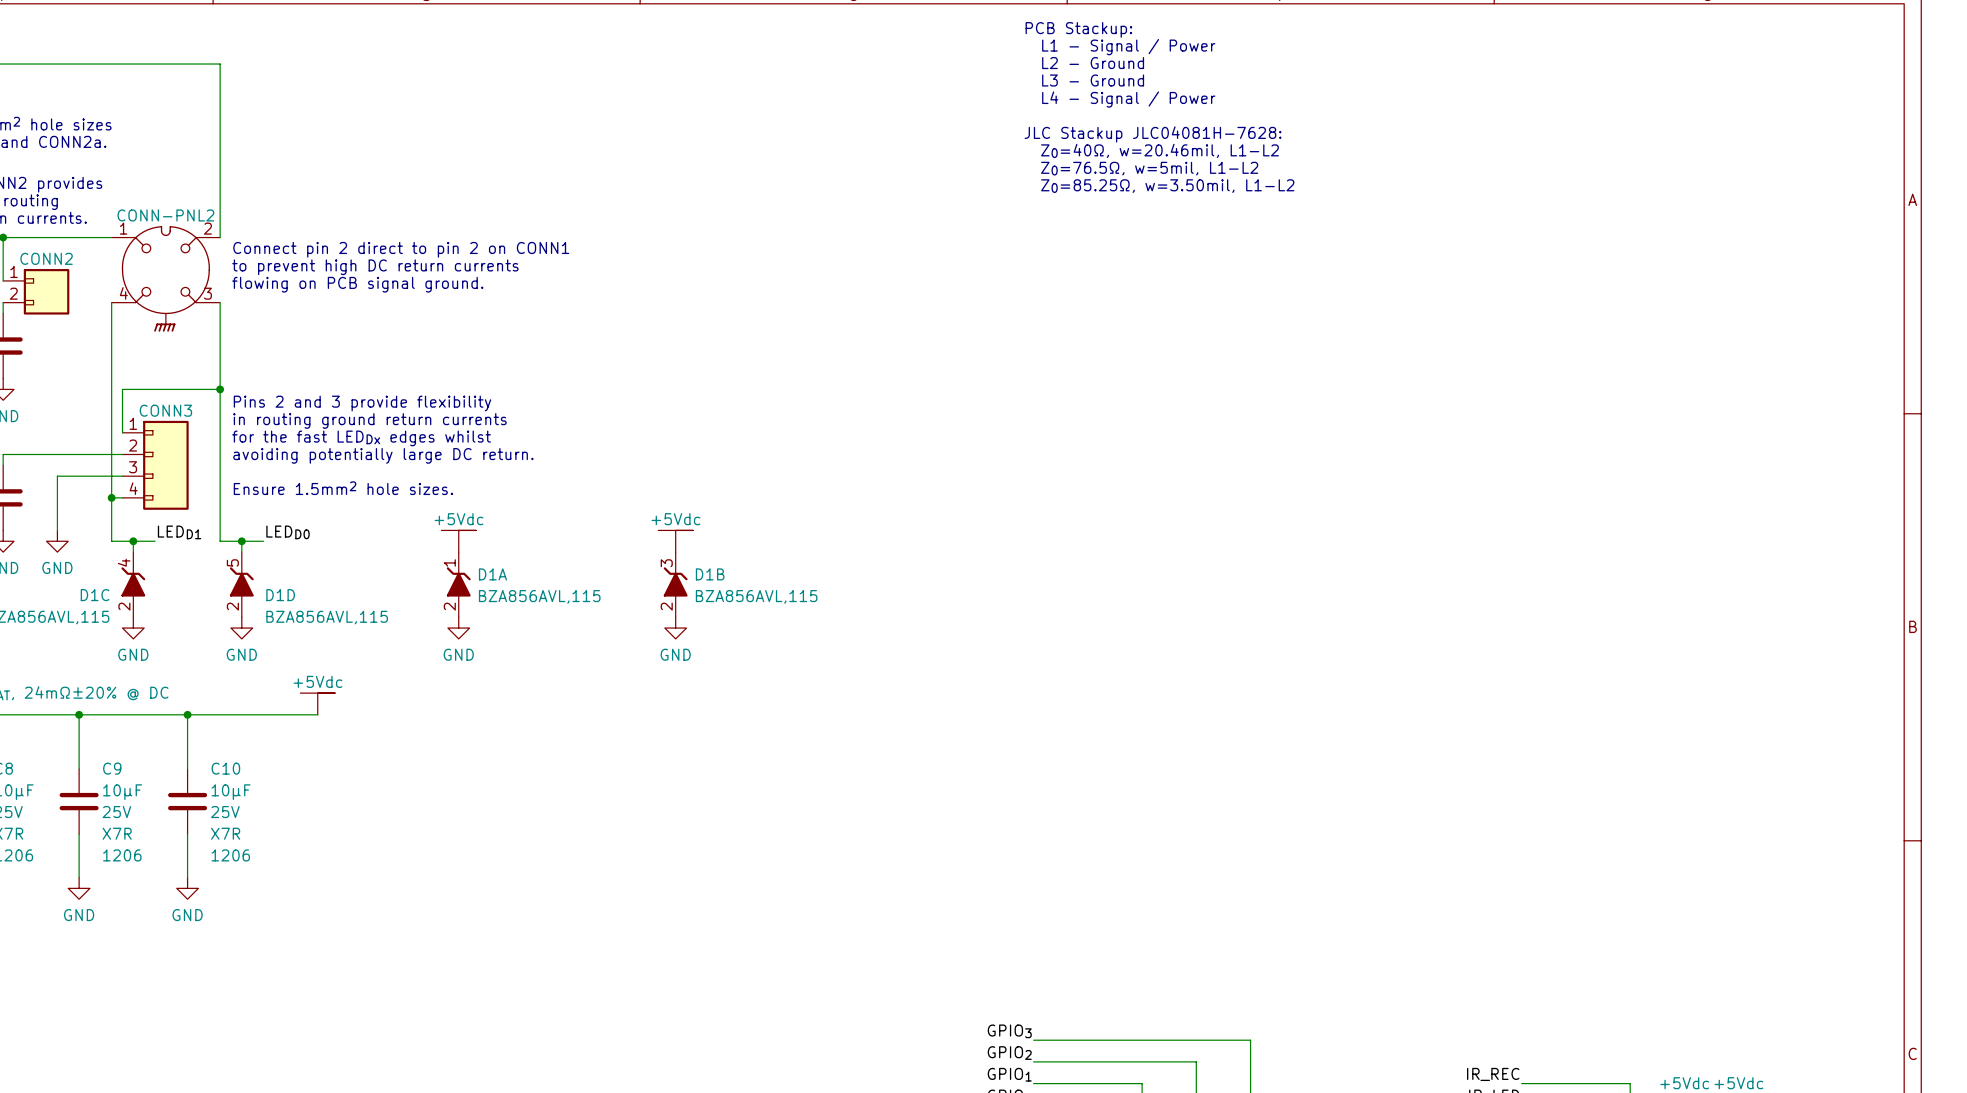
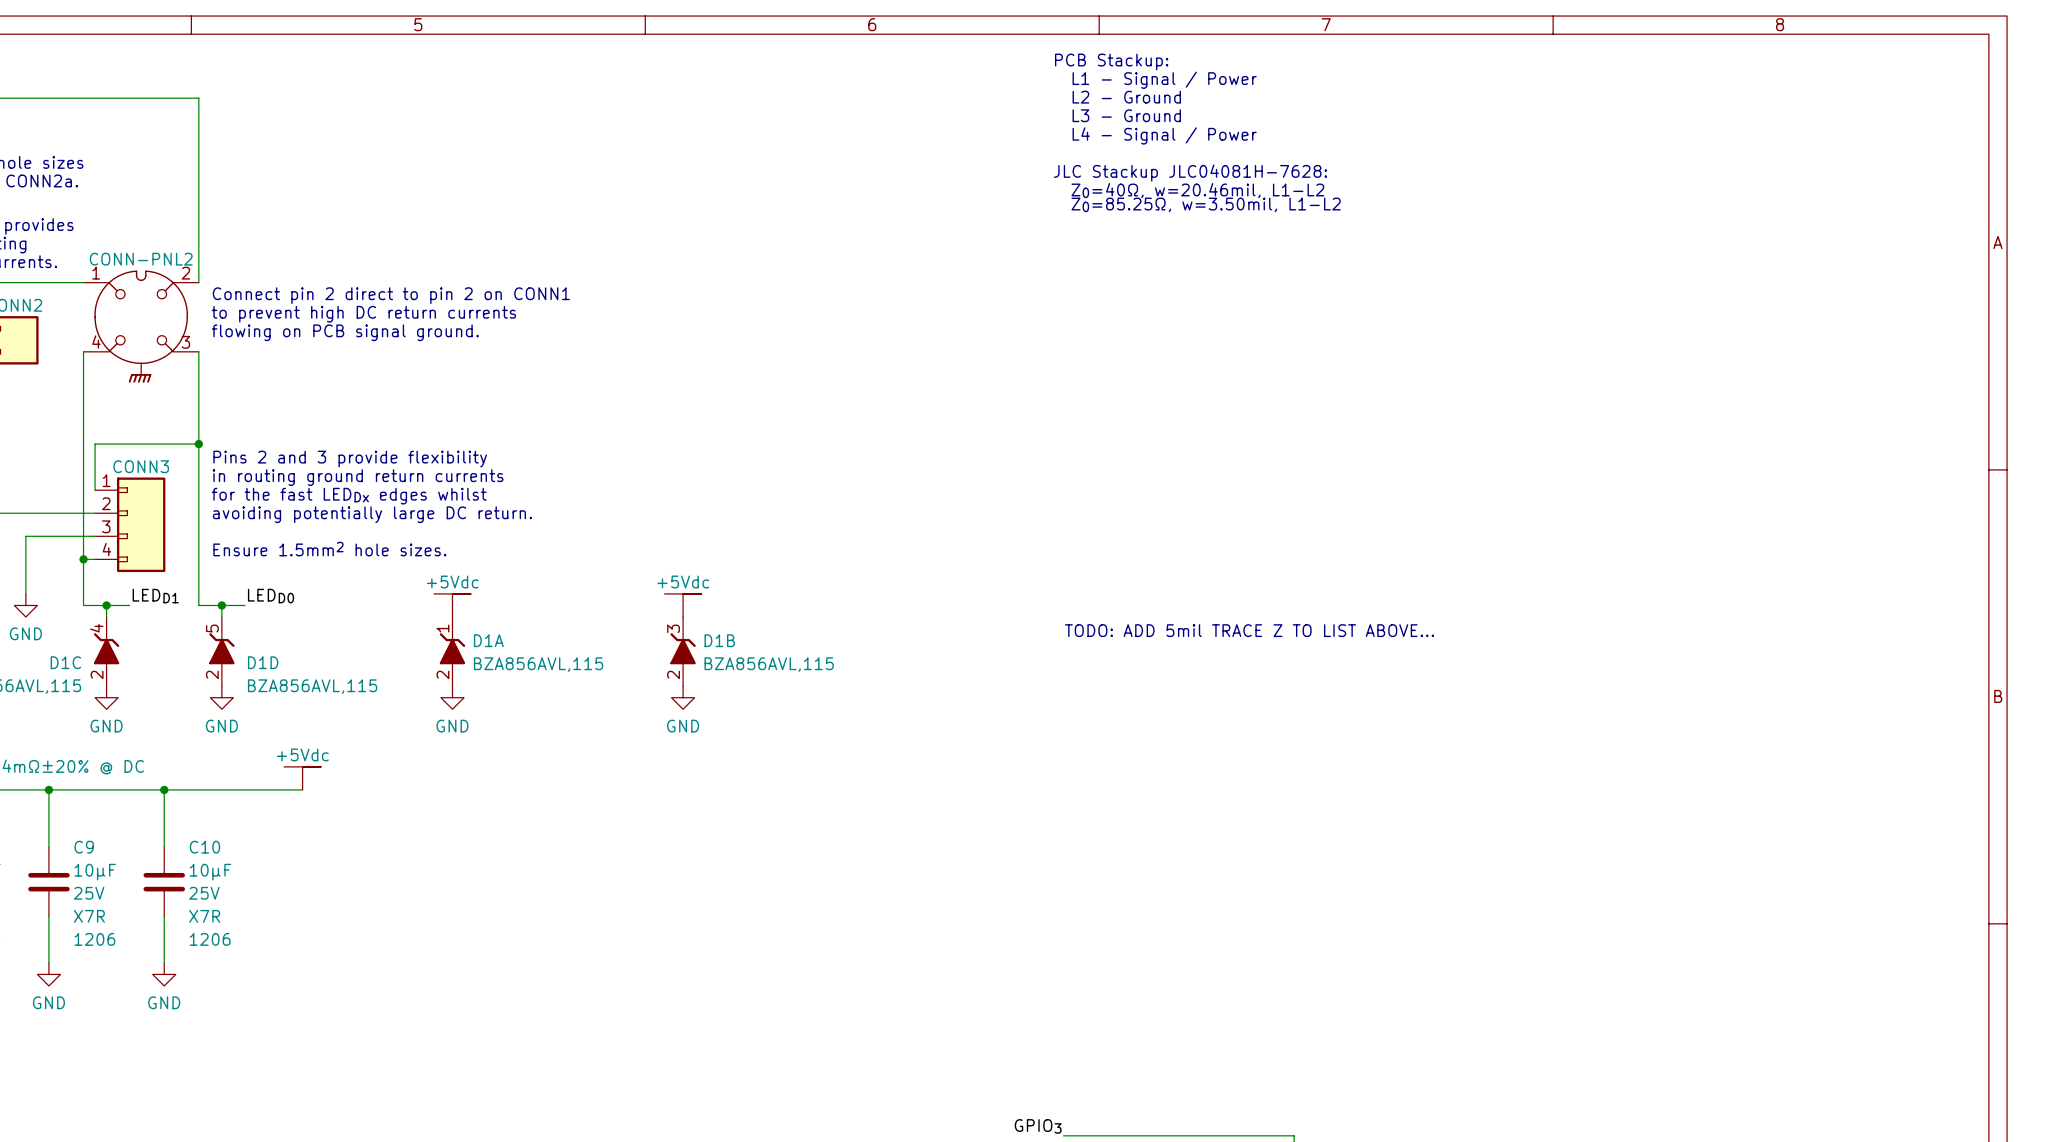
text: Z0=76.5Ω, w=5mil, L1-L2 (1149, 168) -> Z0=85.25Ω, w=3.50mil, L1-L2 (1206, 204)
text: Z0=85.25Ω, w=3.50mil, L1-L2 (1167, 186) -> none
text: none -> TODO: ADD 5mil TRACE Z TO LIST ABOVE... (1249, 630)

